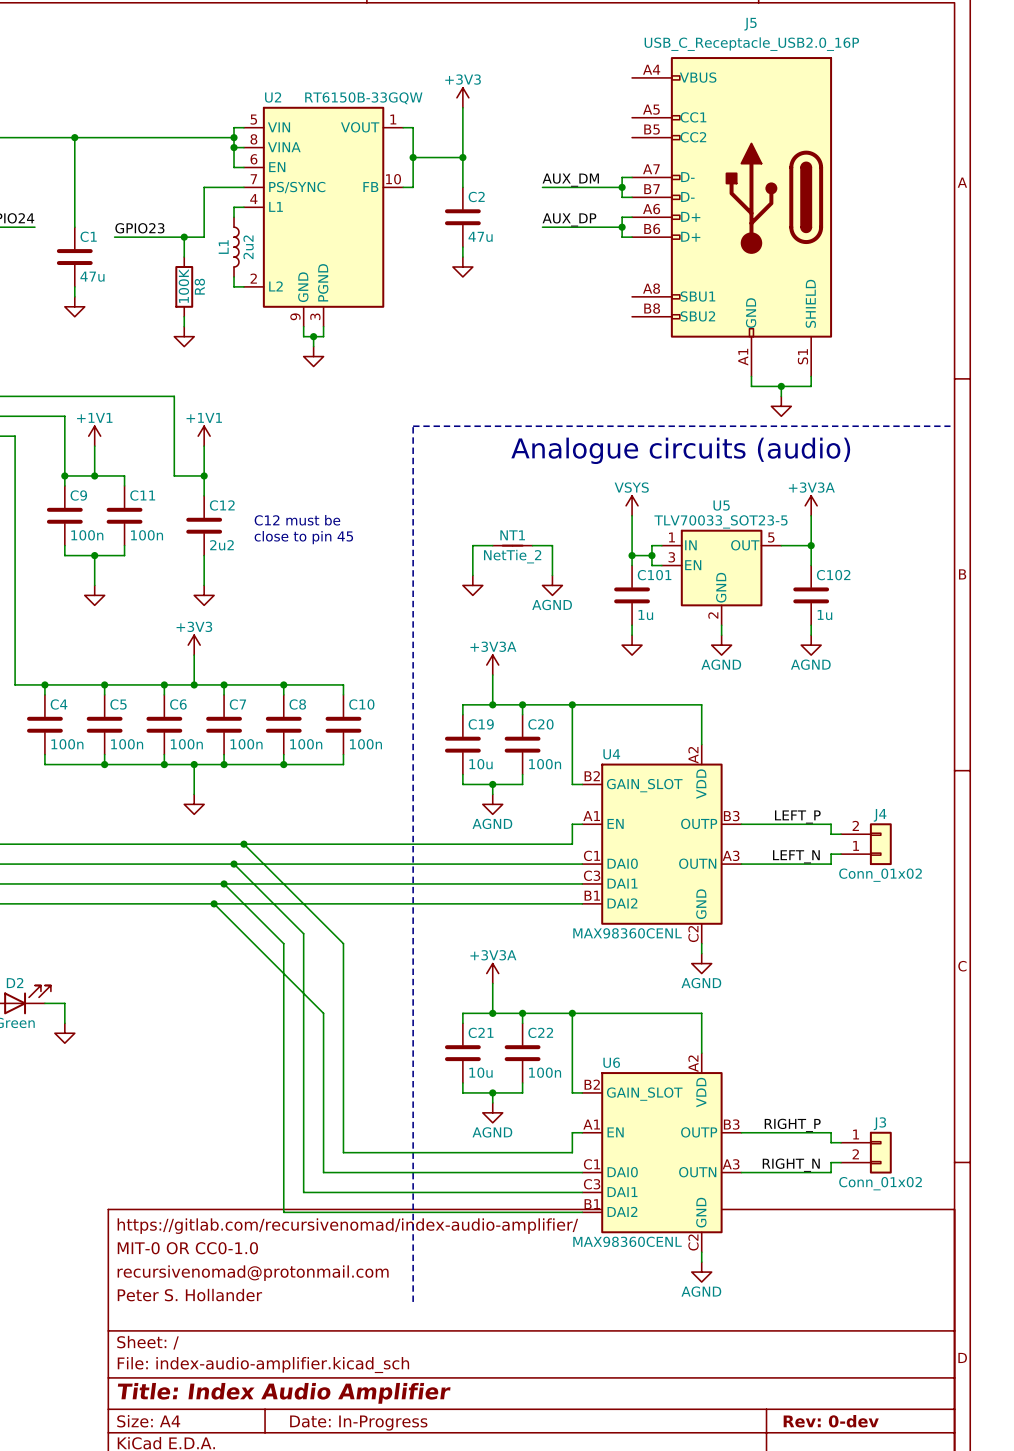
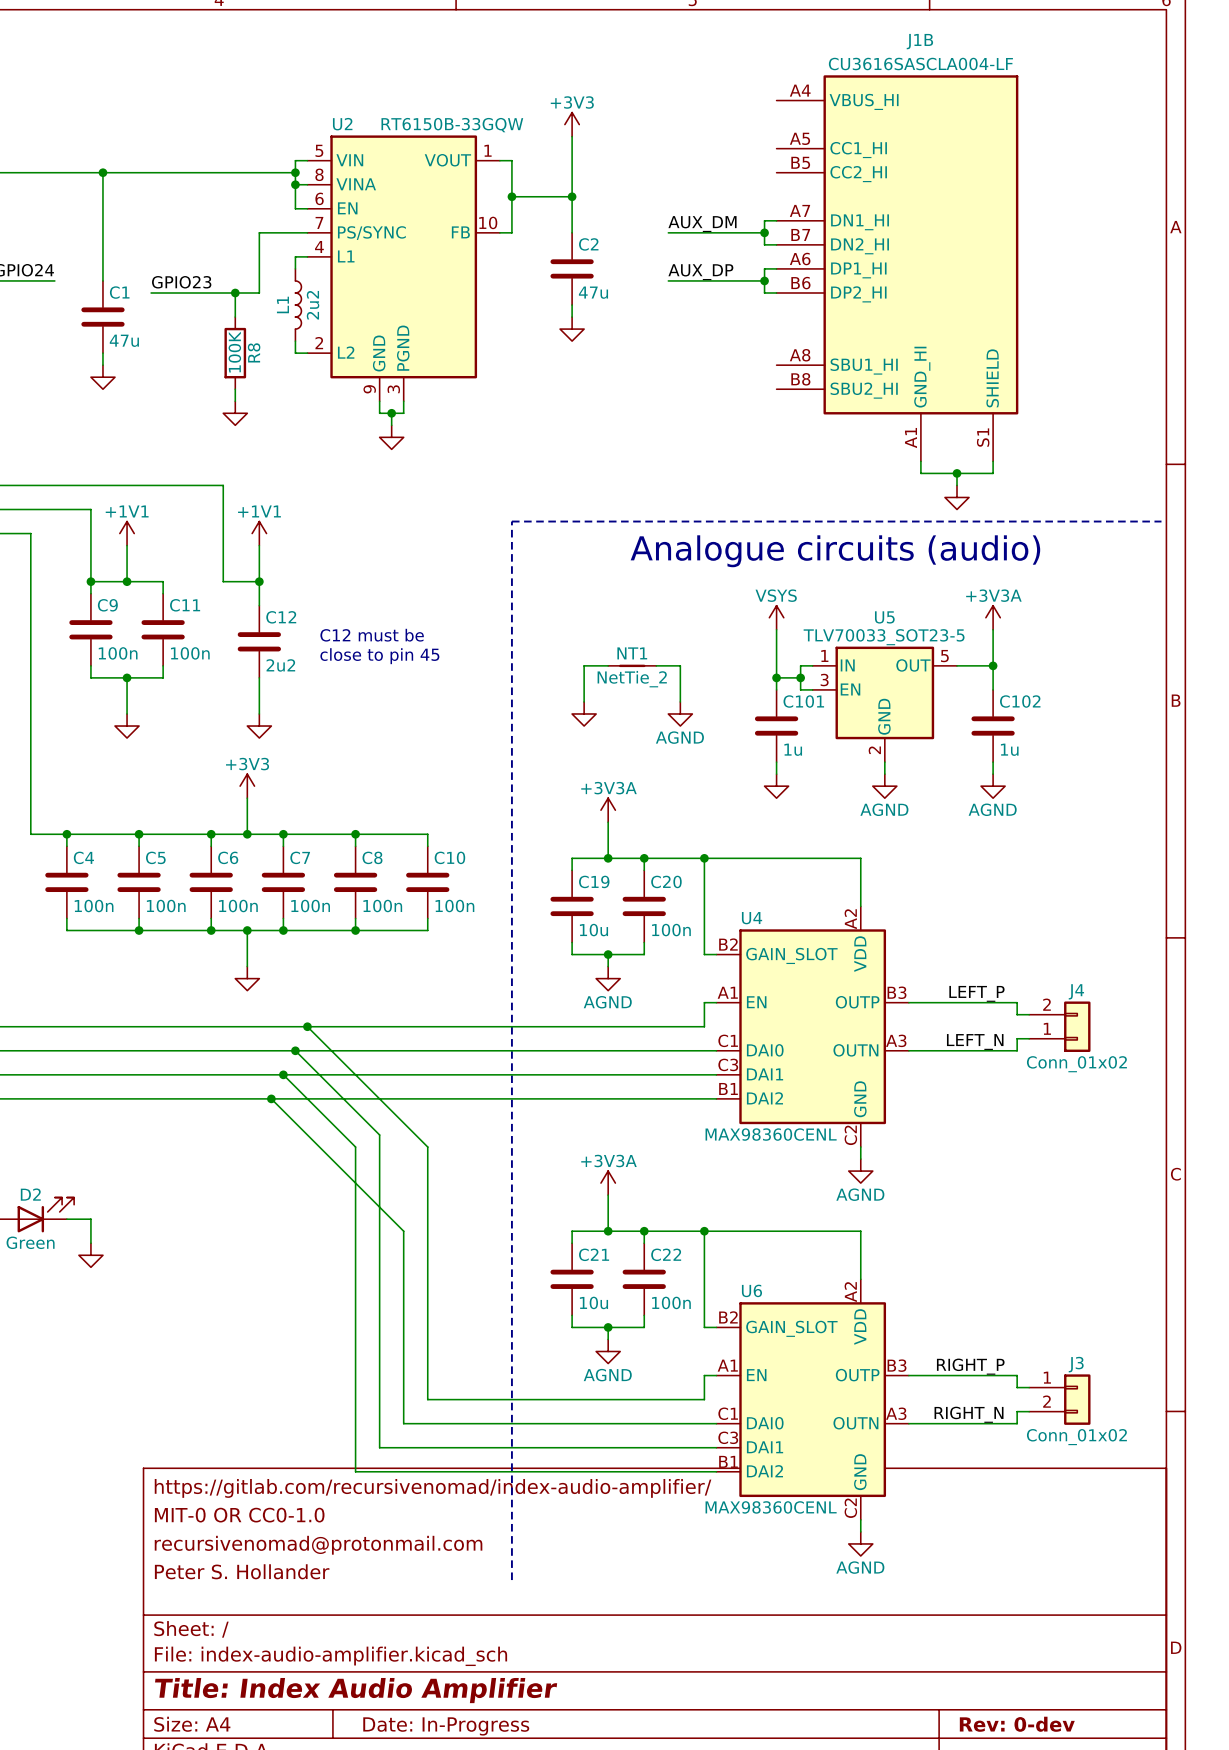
J5: USB_C_Receptacle_USB2.0_16P (732, 216) -> none
J1B: none -> CU3616SASCLA004-LF (897, 268)

